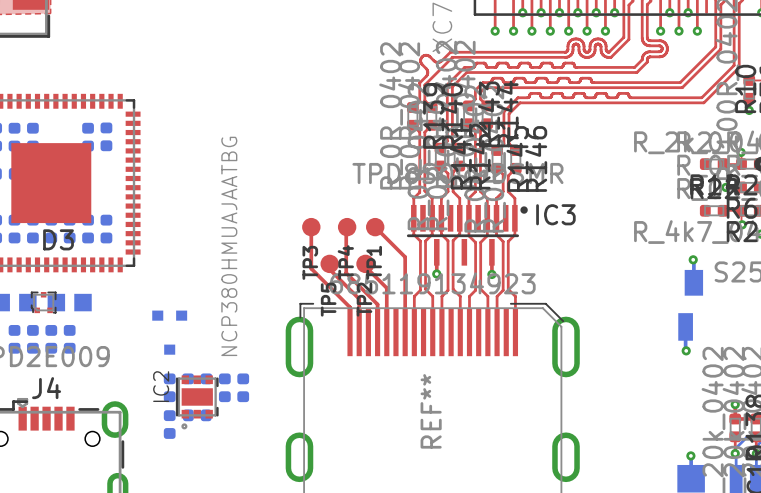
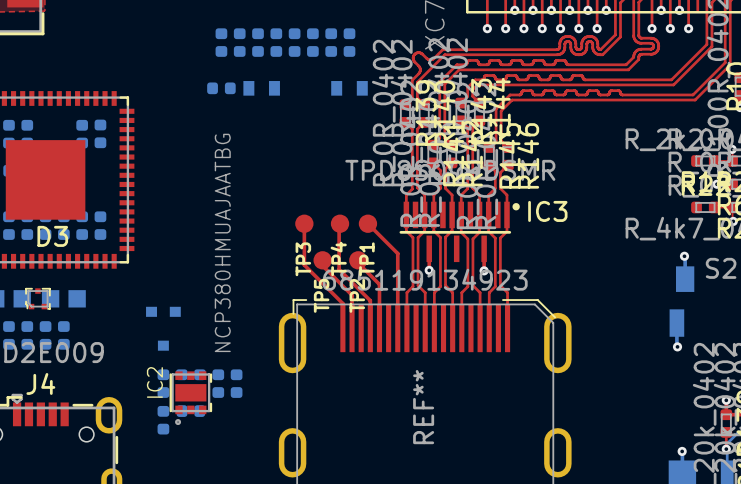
part: none -> (221, 42)
part: none -> (239, 42)
part: none -> (258, 42)
part: none -> (276, 42)
part: none -> (294, 42)
part: none -> (312, 42)
part: none -> (331, 42)
part: none -> (349, 42)
part: none -> (221, 88)
part: none -> (261, 88)
part: none -> (349, 88)

